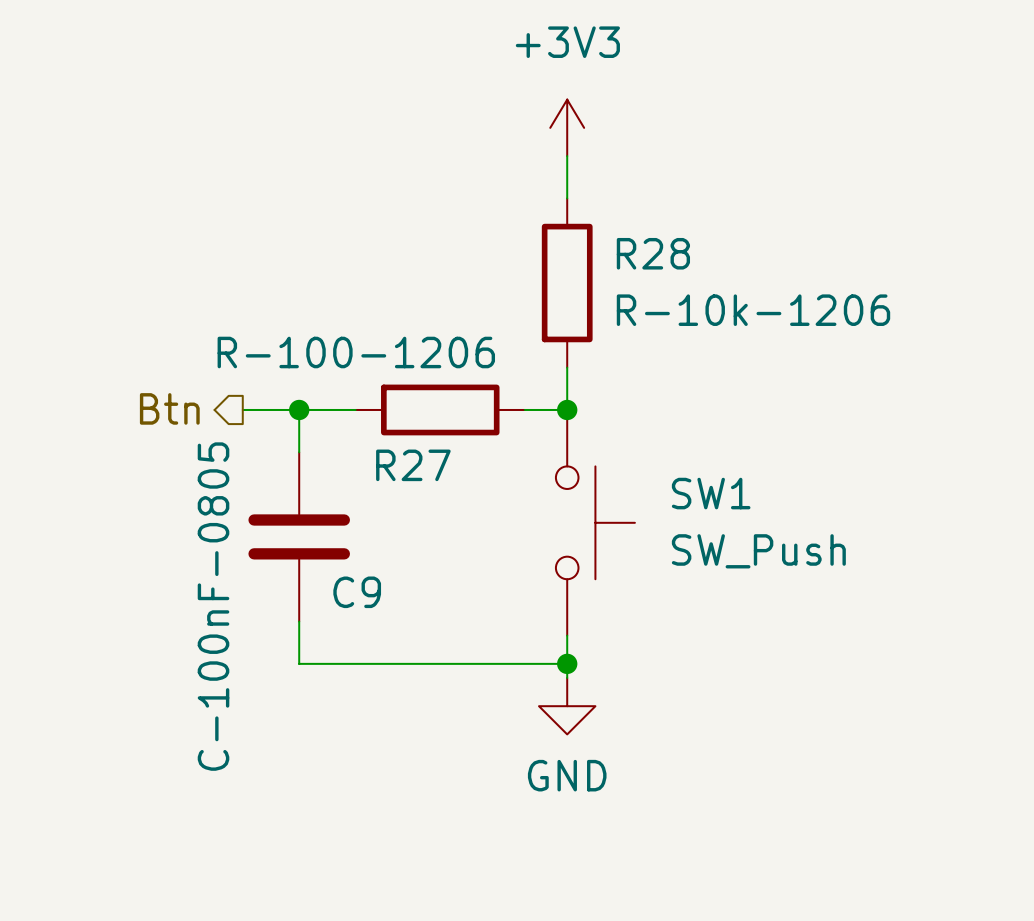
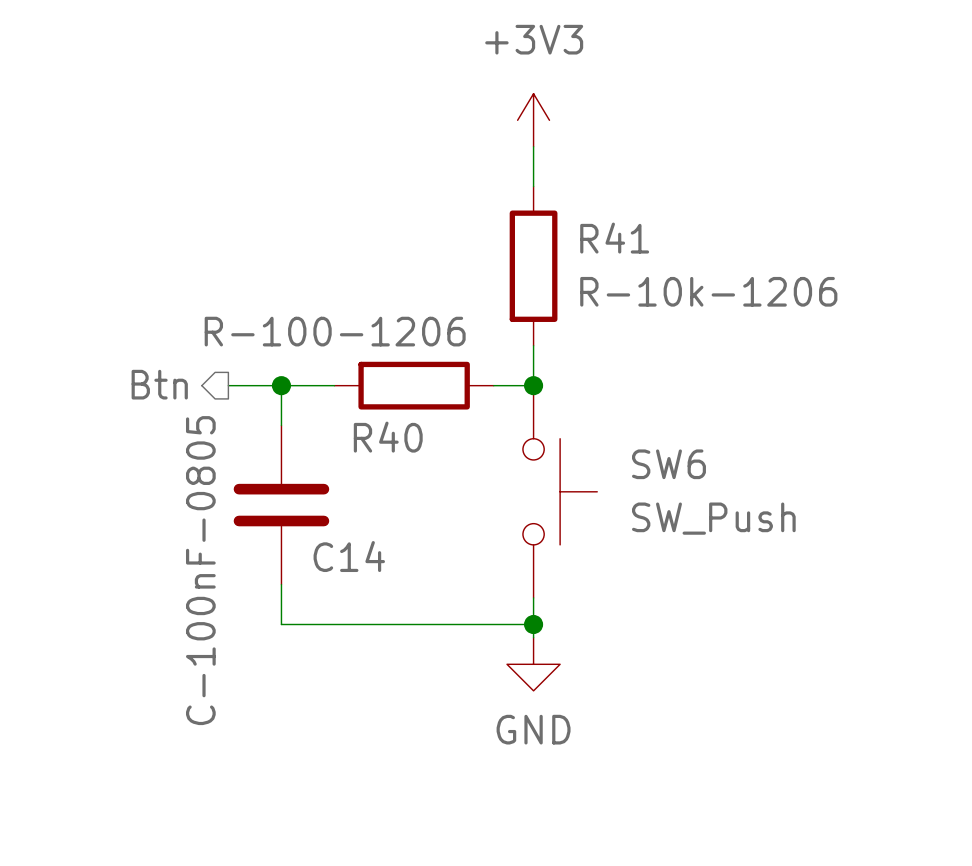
R28 name: R28 (653, 253) -> R41 (614, 238)
R27 name: R27 (413, 465) -> R40 (388, 437)
SW1 name: SW1 (711, 493) -> SW6 (668, 464)
C9 name: C9 (357, 592) -> C14 (349, 556)

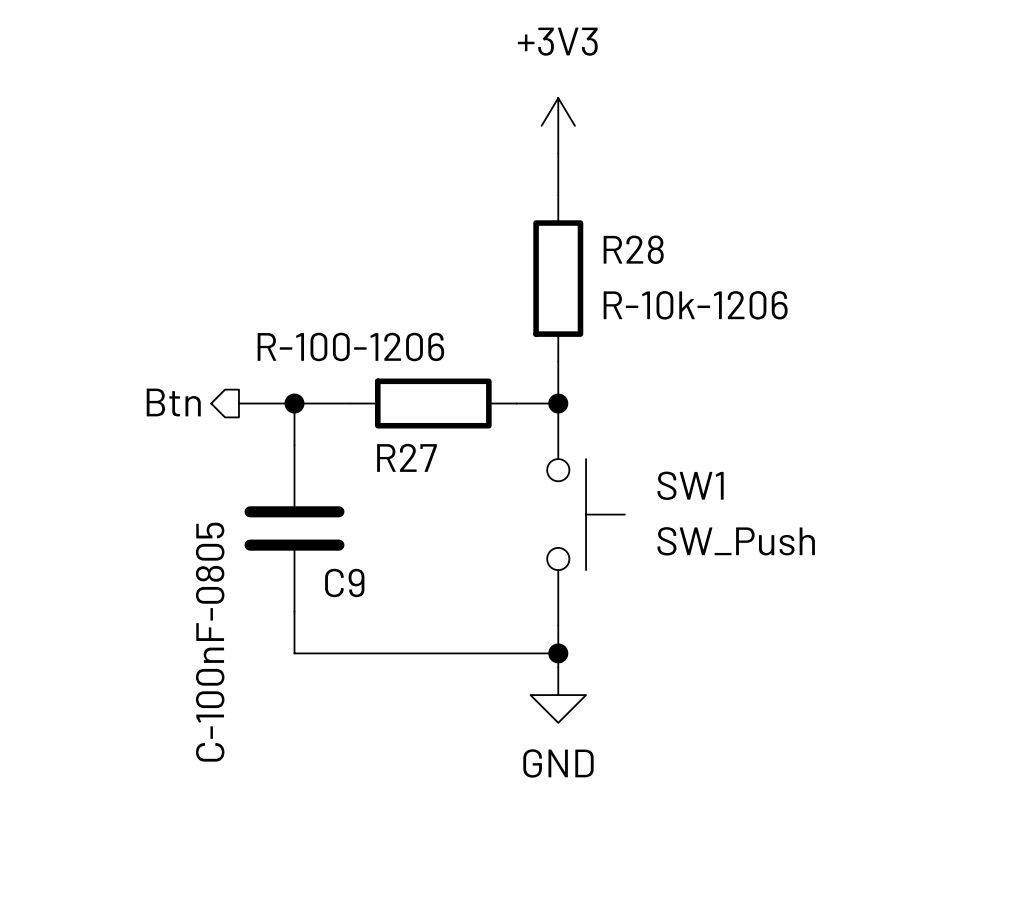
R41 name: R41 (614, 238) -> R28 (633, 249)
R40 name: R40 (388, 437) -> R27 (406, 457)
SW6 name: SW6 (668, 464) -> SW1 (690, 485)
C14 name: C14 (349, 556) -> C9 (344, 582)

